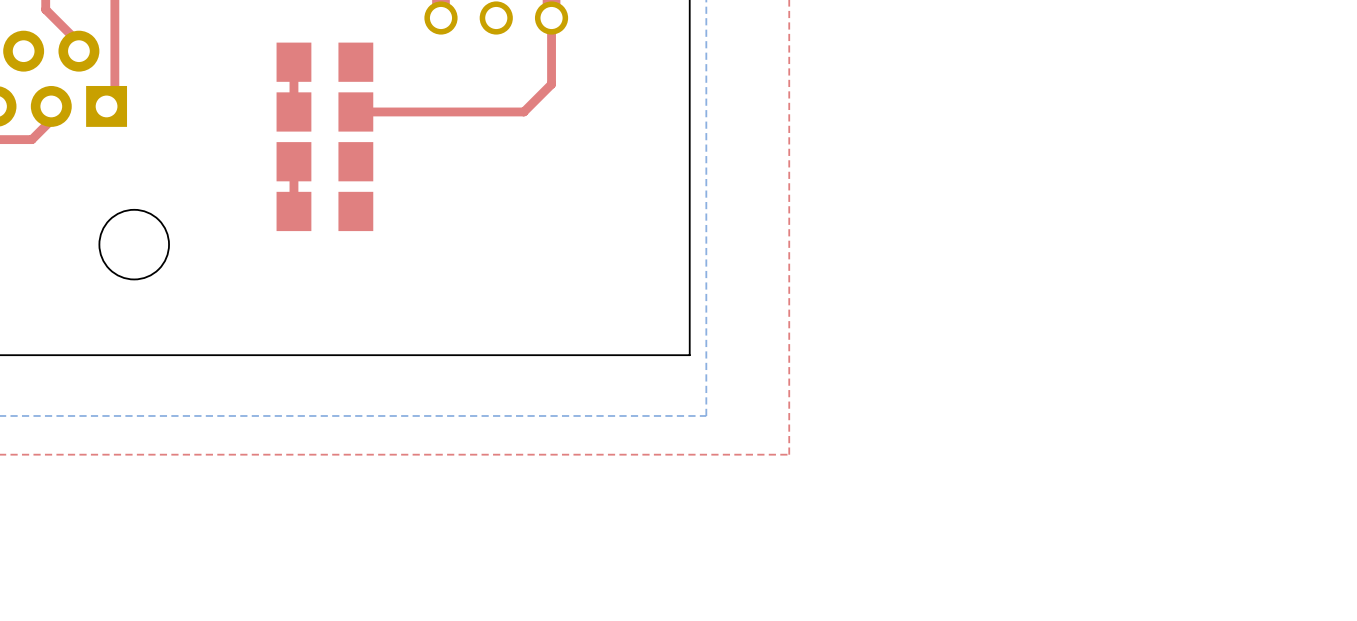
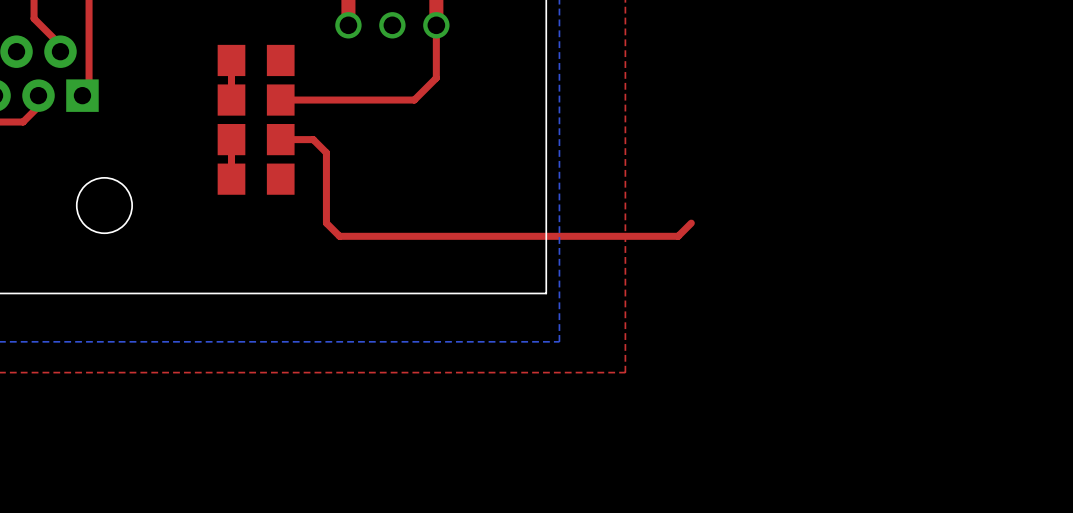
top track: none -> (280, 139) (313, 139) (326, 152) (326, 223) (339, 236) (678, 236) (691, 223)

